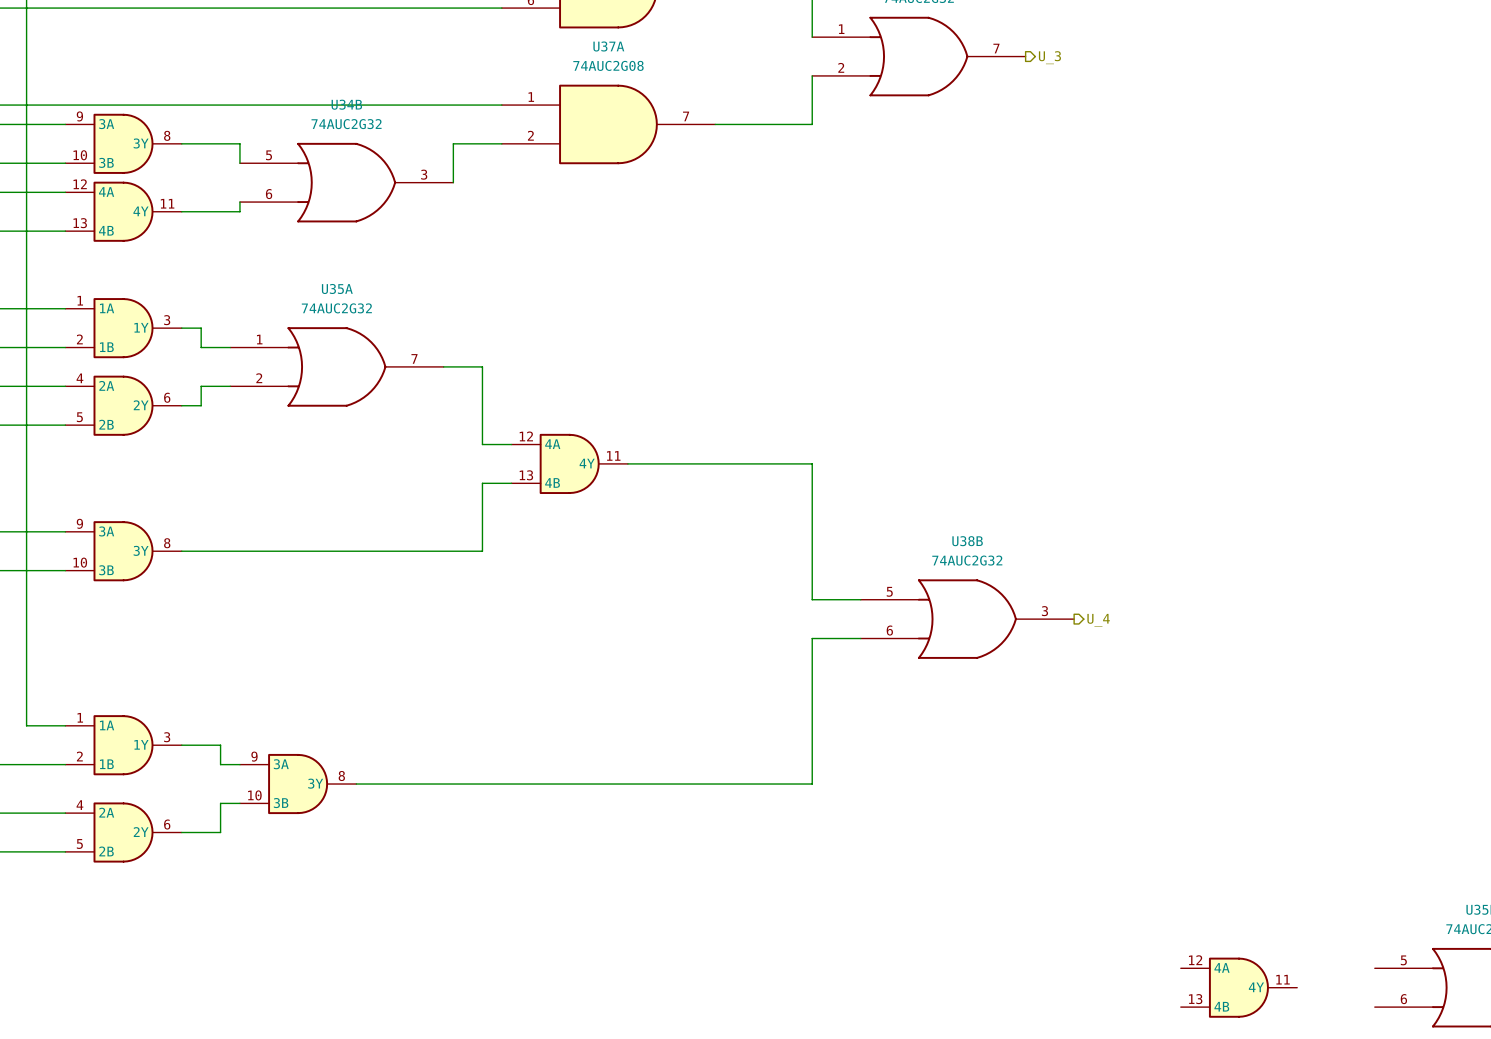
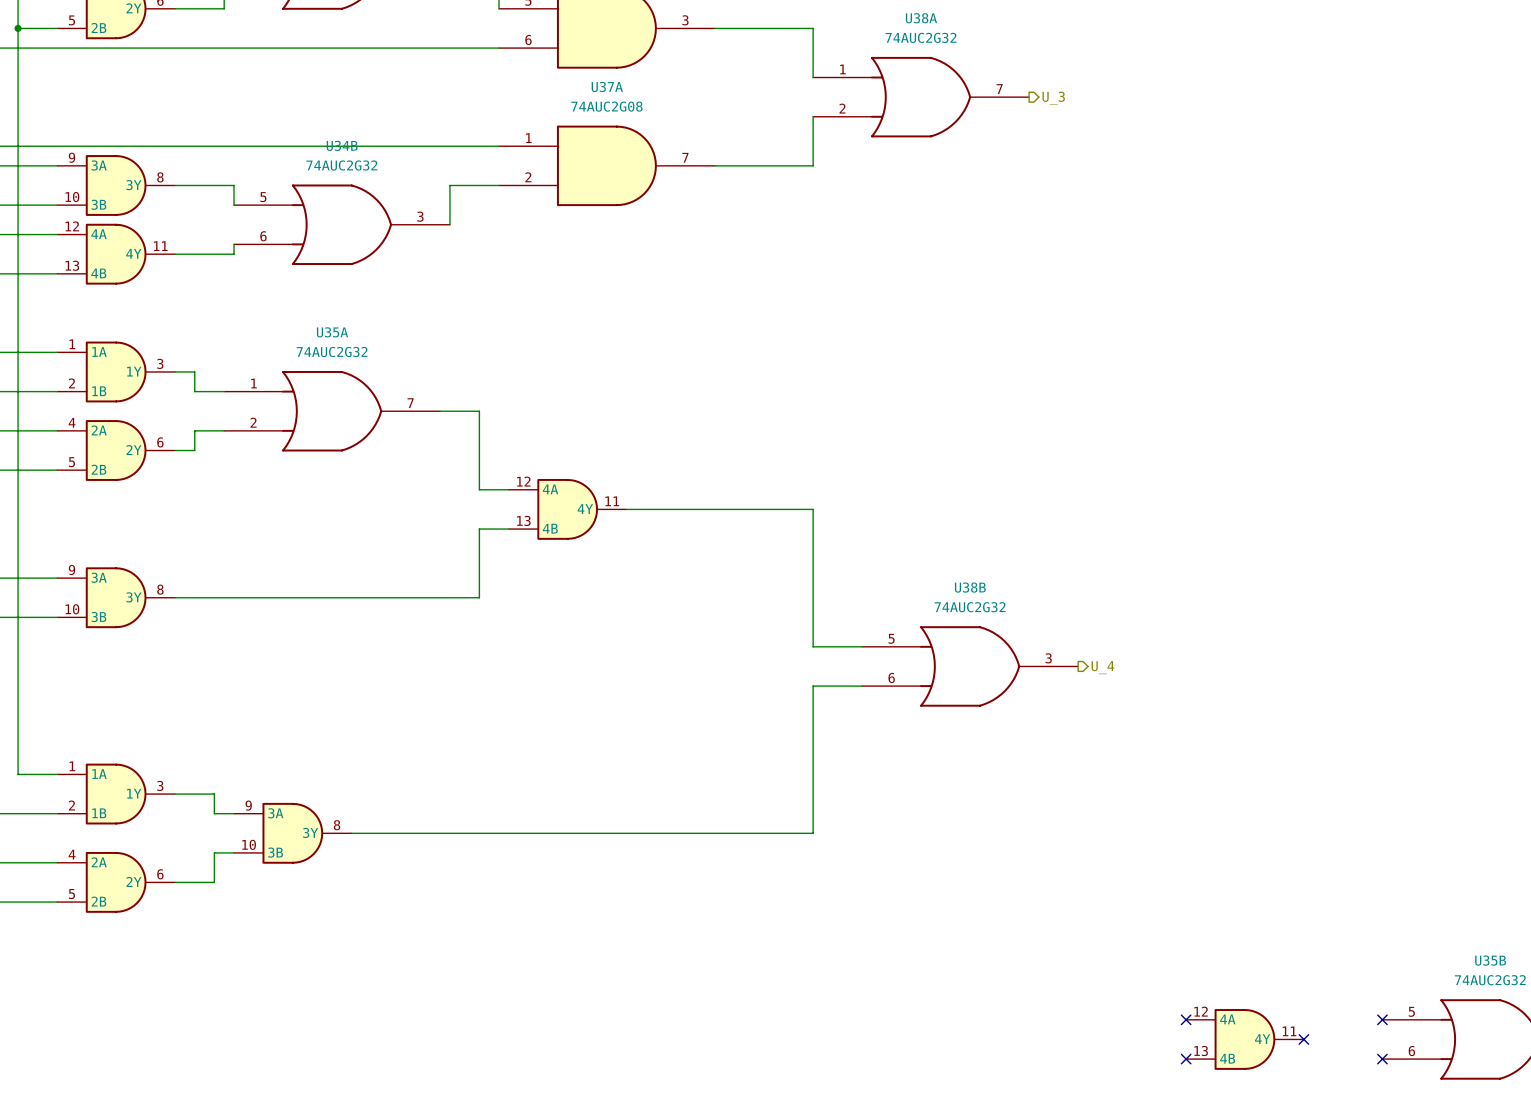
no-connect mark: none -> (1186, 1019)
no-connect mark: none -> (1382, 1019)
no-connect mark: none -> (1303, 1039)
no-connect mark: none -> (1186, 1059)
no-connect mark: none -> (1382, 1059)

